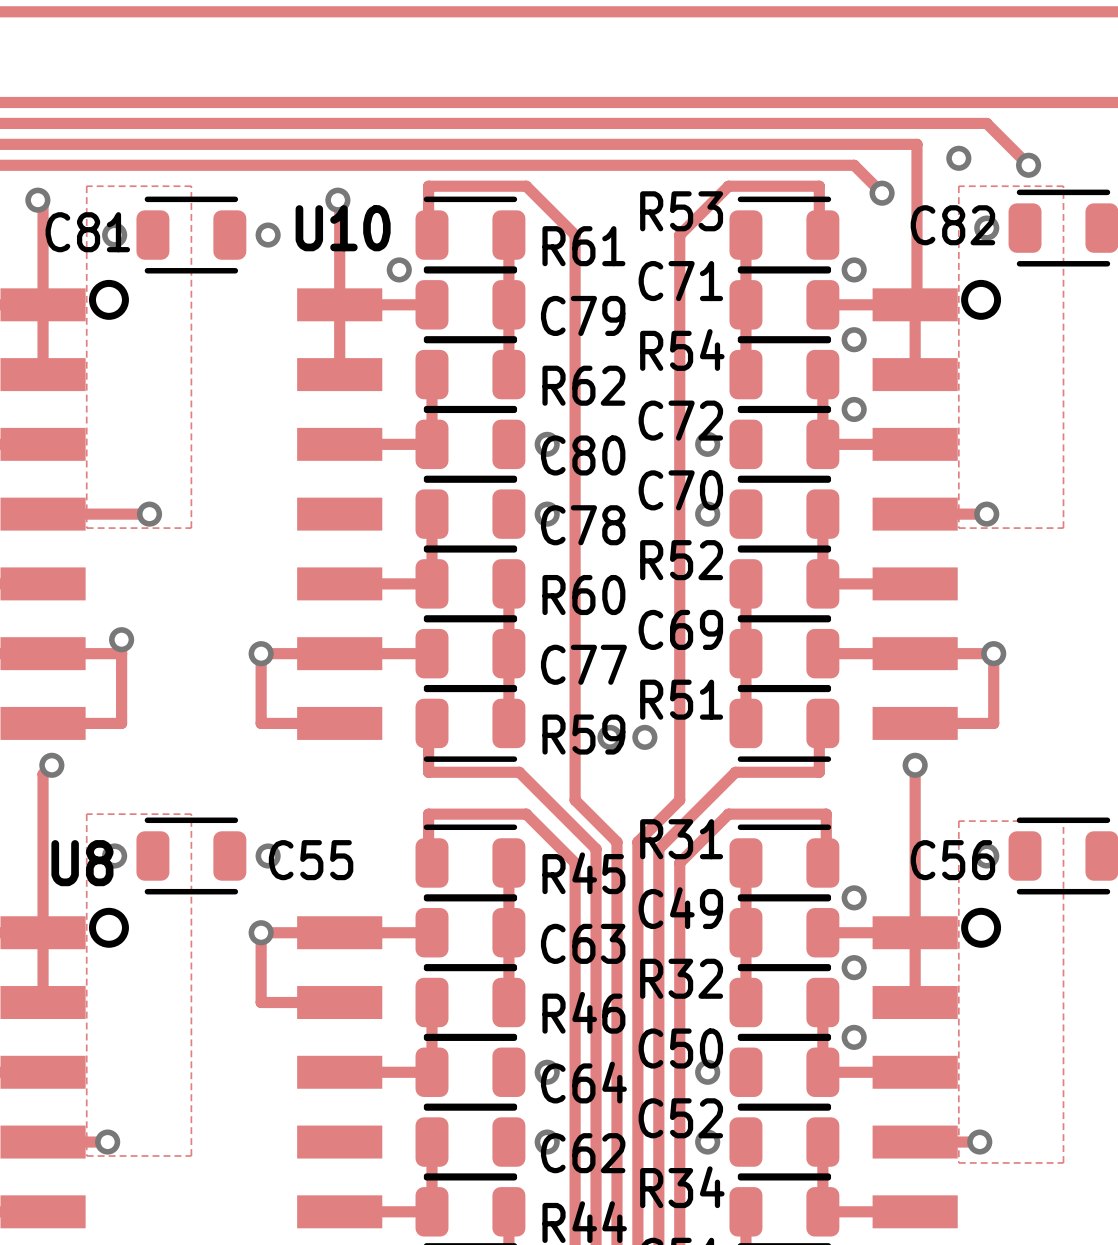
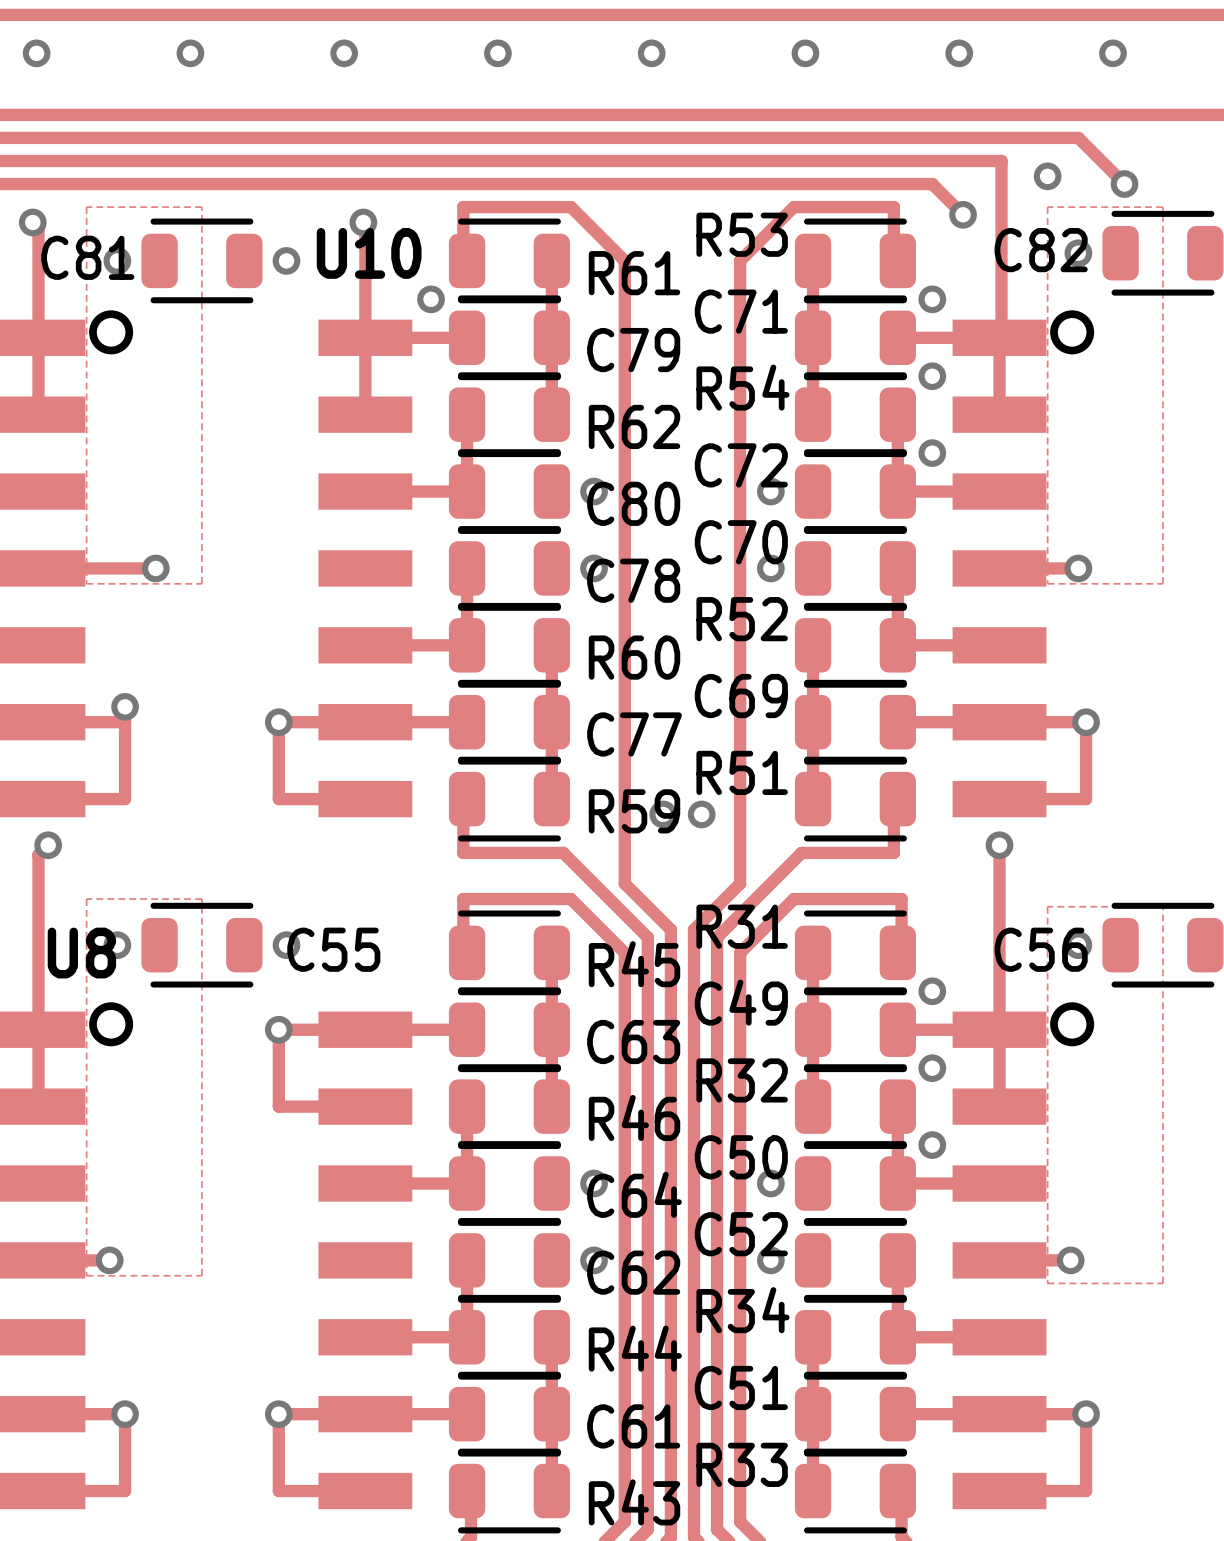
via: none -> (36, 53)
via: none -> (190, 53)
via: none -> (344, 53)
via: none -> (497, 53)
via: none -> (651, 53)
via: none -> (805, 53)
via: none -> (959, 53)
via: none -> (1112, 53)

